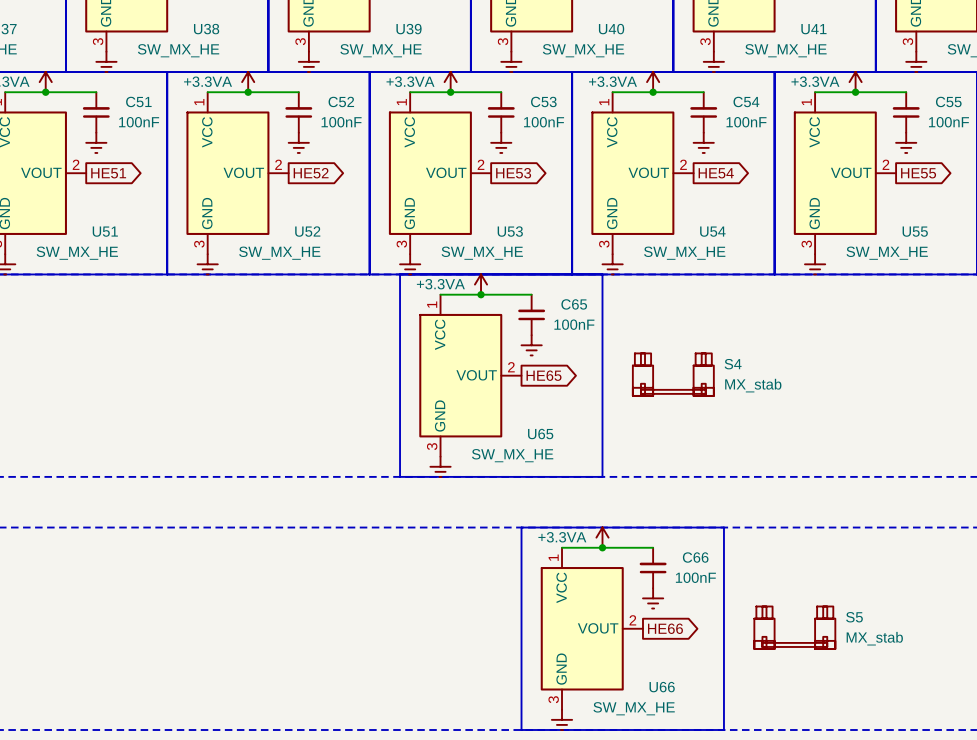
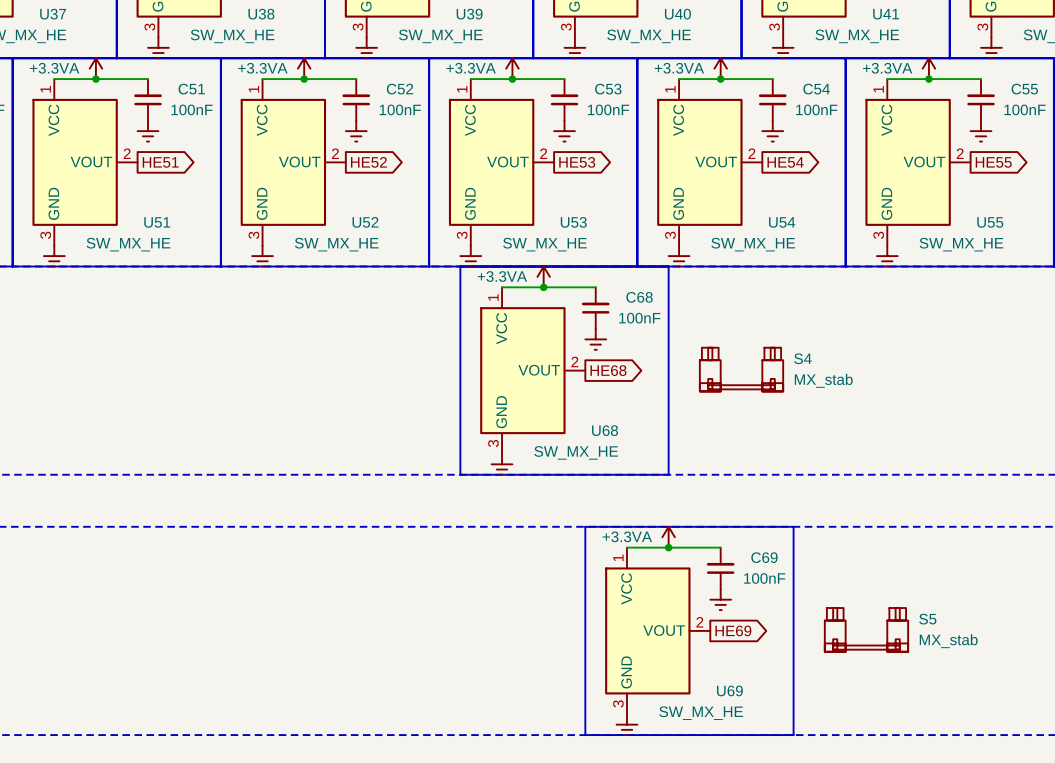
C65 name: C65 (574, 304) -> C68 (639, 297)
global label: HE65 (544, 375) -> HE68 (608, 370)
U65 name: U65 (540, 434) -> U68 (605, 430)
C66 name: C66 (695, 557) -> C69 (764, 557)
global label: HE66 (665, 628) -> HE69 (733, 630)
U66 name: U66 (662, 687) -> U69 (729, 690)

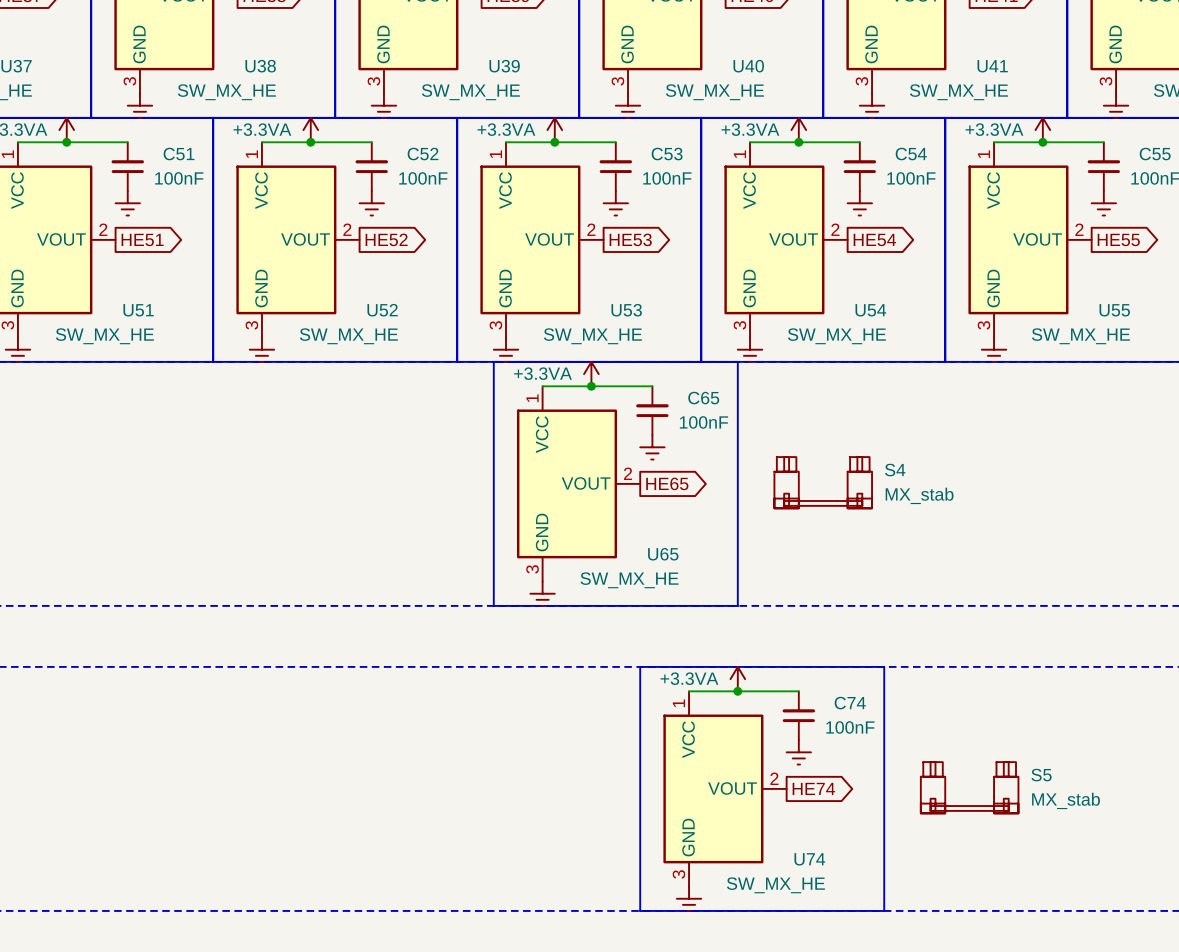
C68 name: C68 (639, 297) -> C65 (703, 398)
global label: HE68 (608, 370) -> HE65 (667, 483)
U68 name: U68 (605, 430) -> U65 (663, 554)
C69 name: C69 (764, 557) -> C74 (850, 703)
global label: HE69 (733, 630) -> HE74 (813, 788)
U69 name: U69 (729, 690) -> U74 (809, 859)

